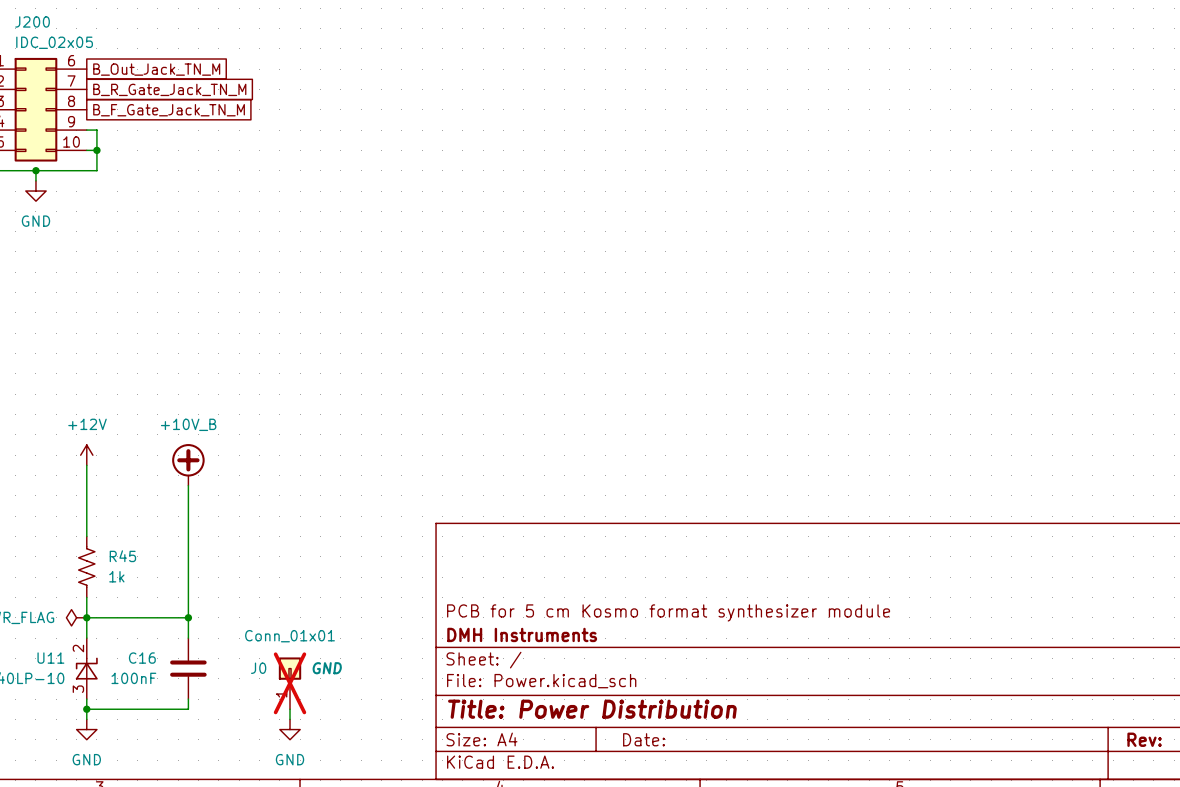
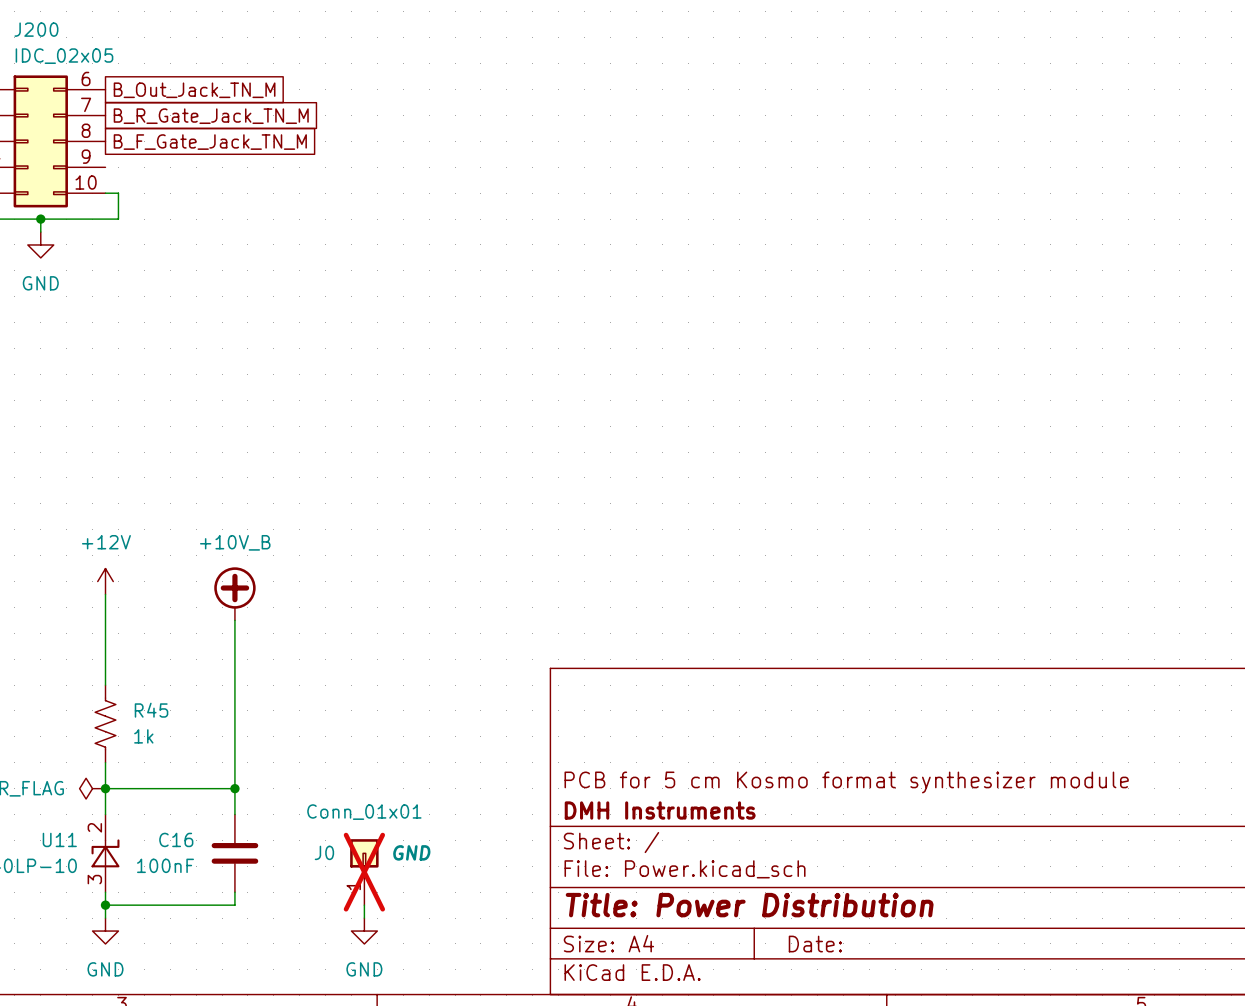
wire: (86, 130) (96, 130) (96, 150) -> none
junction: (96, 150) -> none

